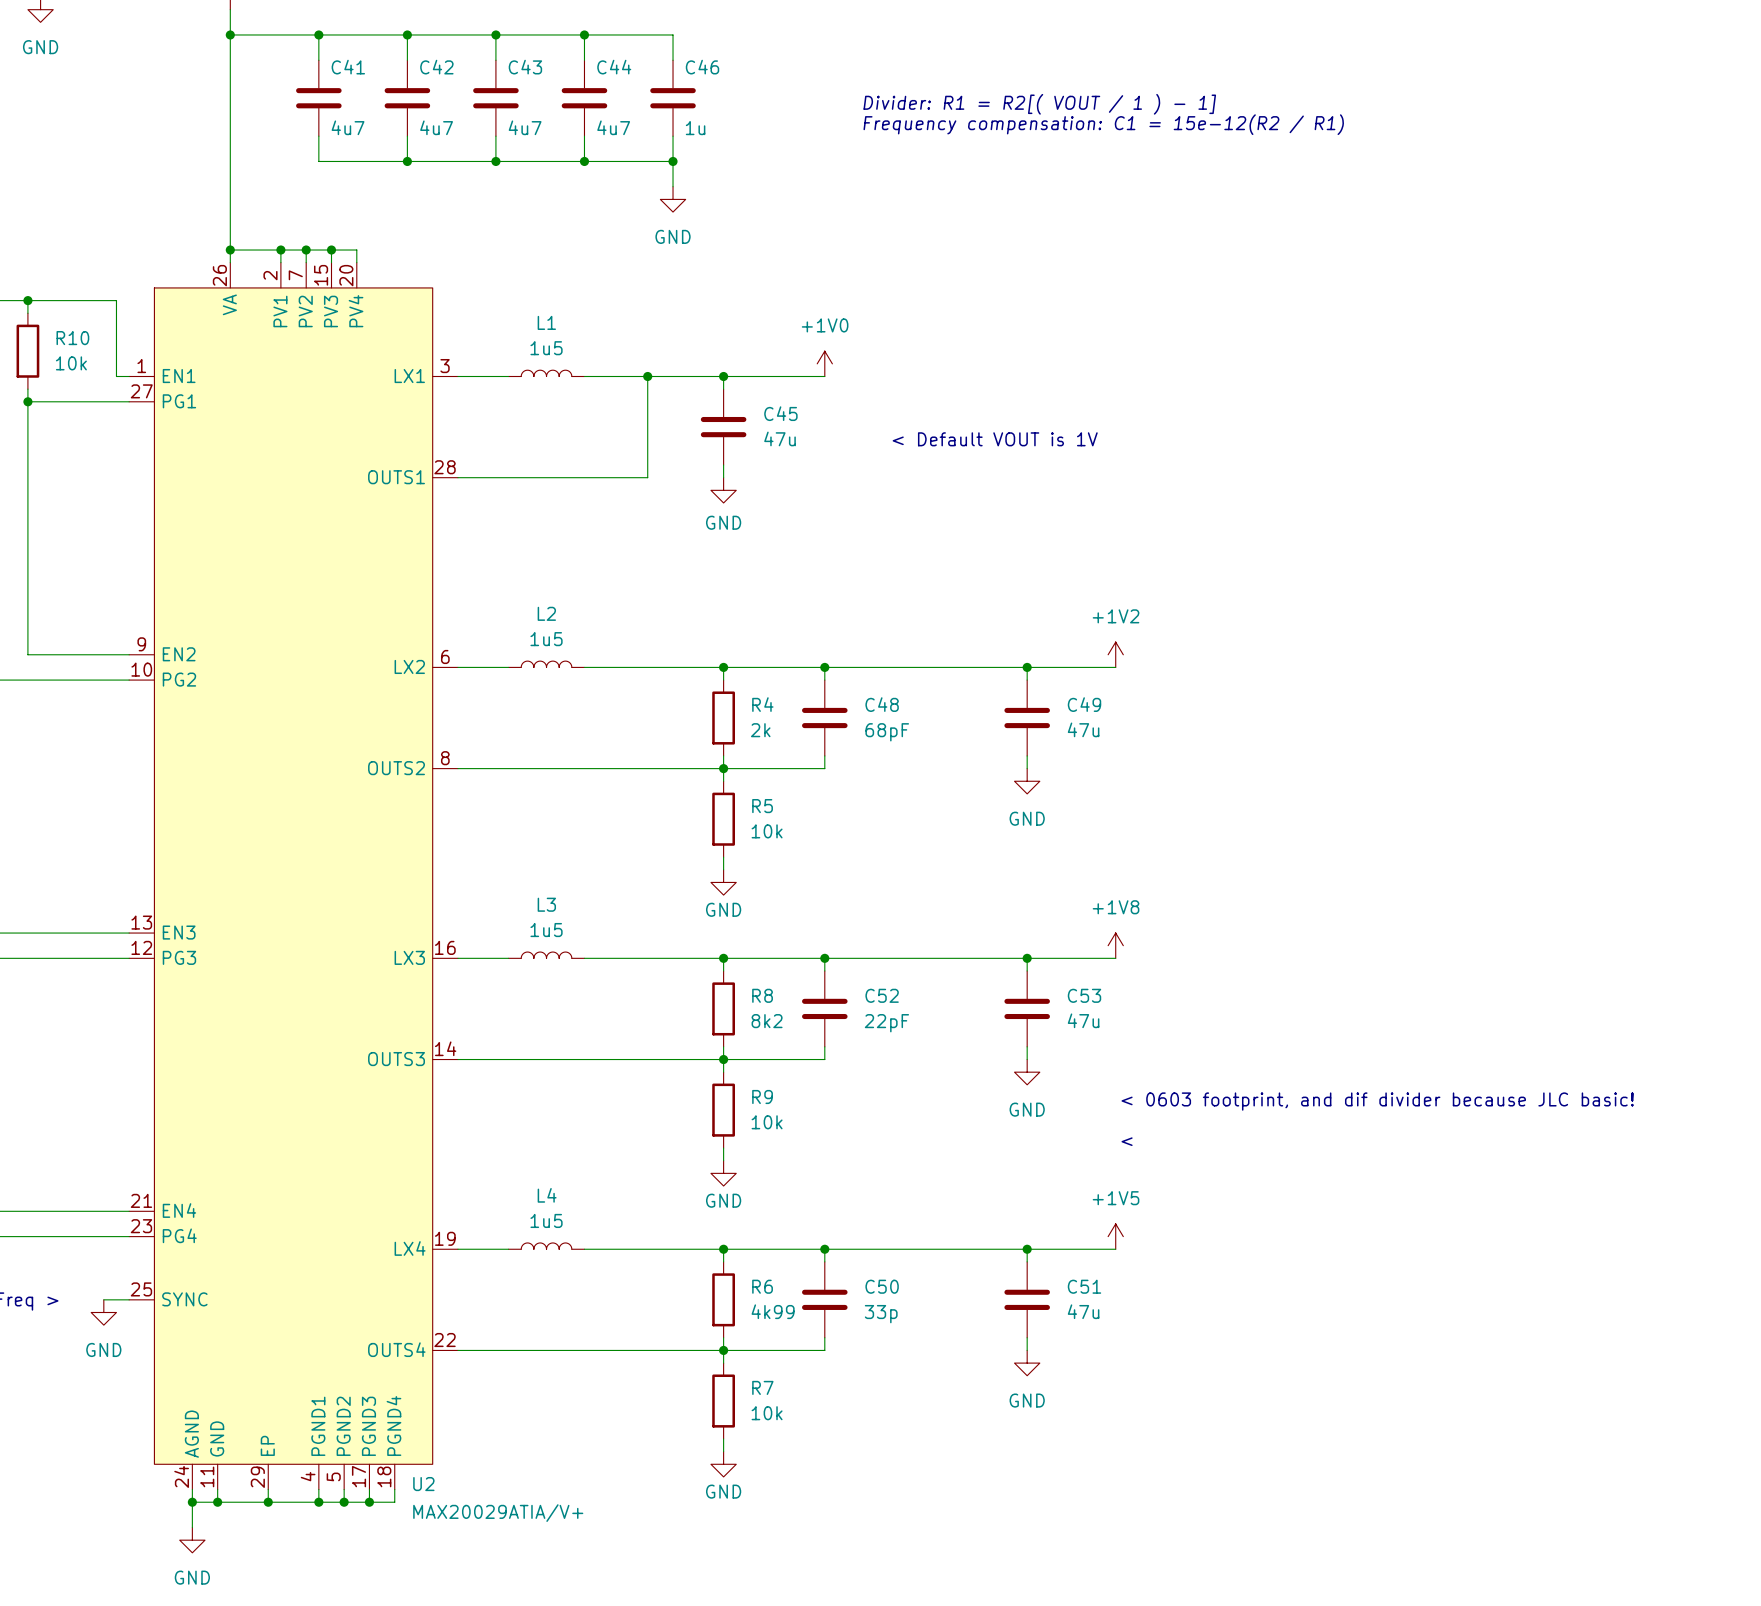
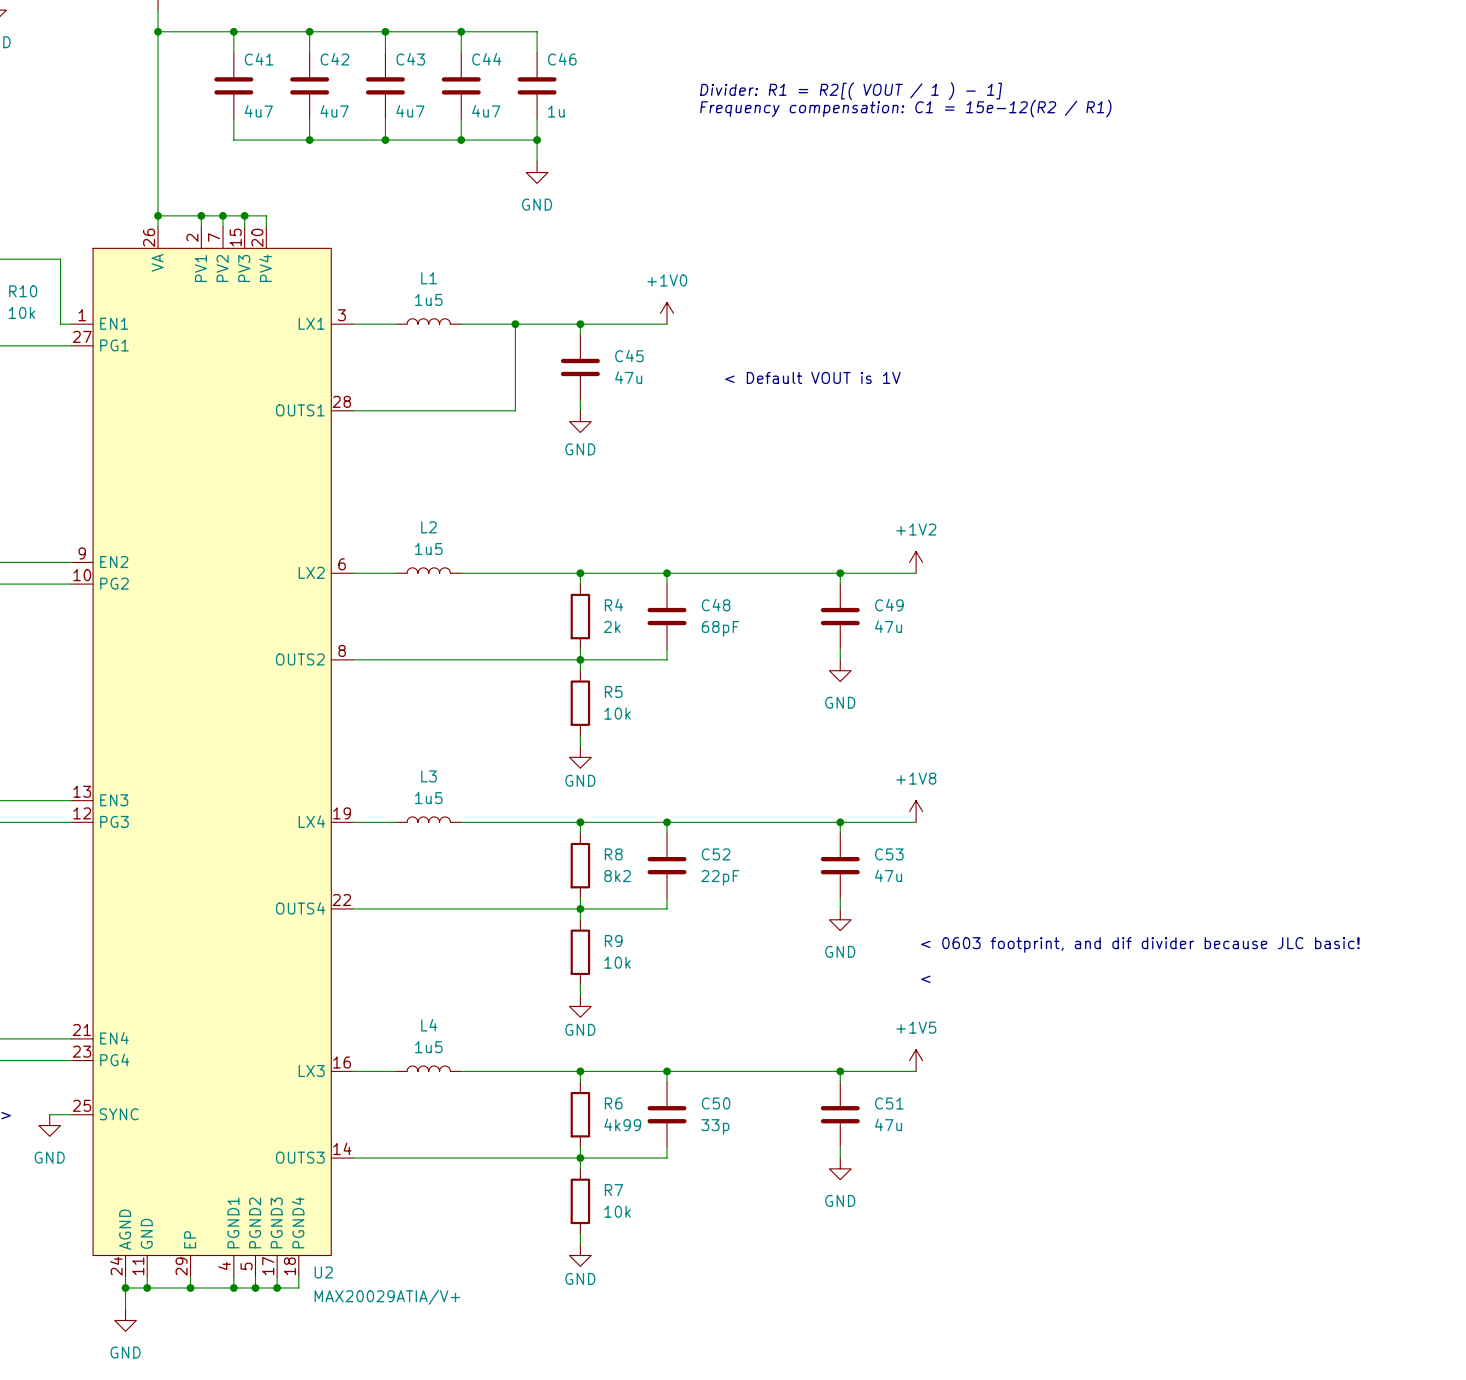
U2 pin number: 16 (445, 947) -> 19 (342, 813)
U2 pin name: LX3 (409, 957) -> LX4 (311, 821)
U2 pin number: 14 (445, 1048) -> 22 (341, 900)
U2 pin name: OUTS3 (396, 1059) -> OUTS4 (300, 908)
U2 pin number: 19 (445, 1238) -> 16 (342, 1062)
U2 pin name: LX4 (410, 1248) -> LX3 (311, 1071)
U2 pin number: 22 (445, 1340) -> 14 (342, 1148)
U2 pin name: OUTS4 (396, 1349) -> OUTS3 (300, 1157)

